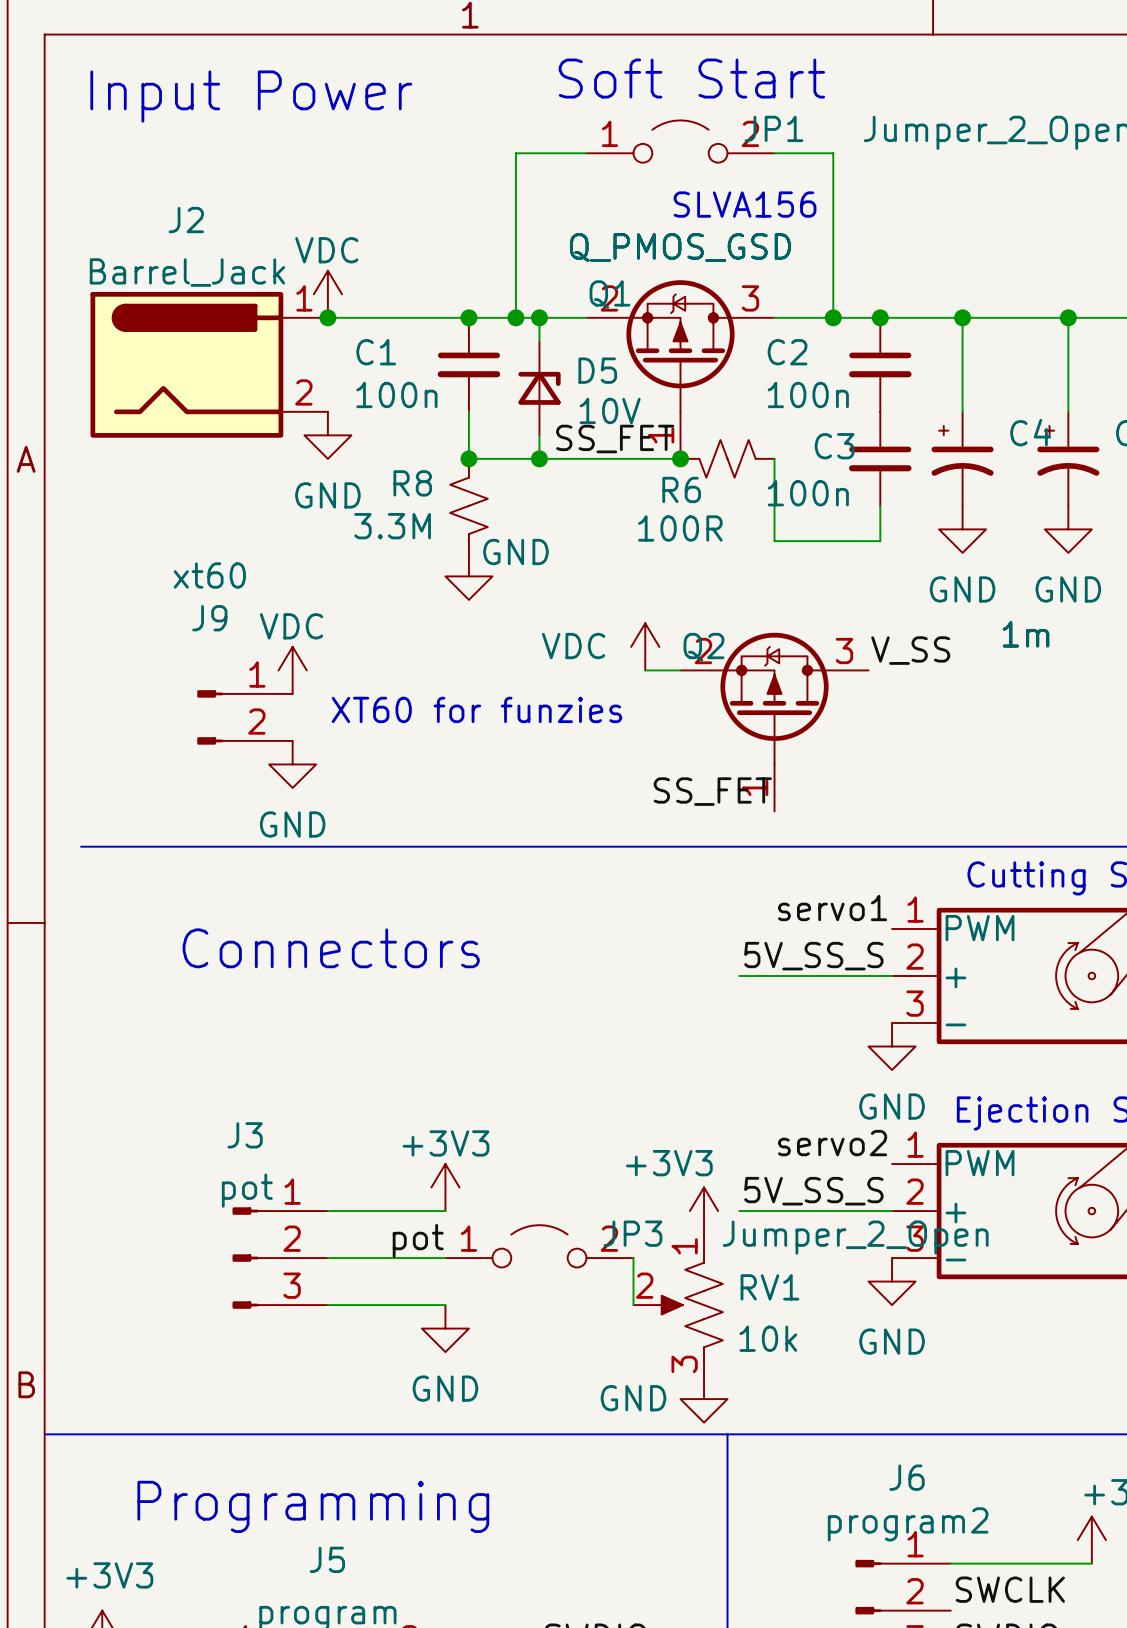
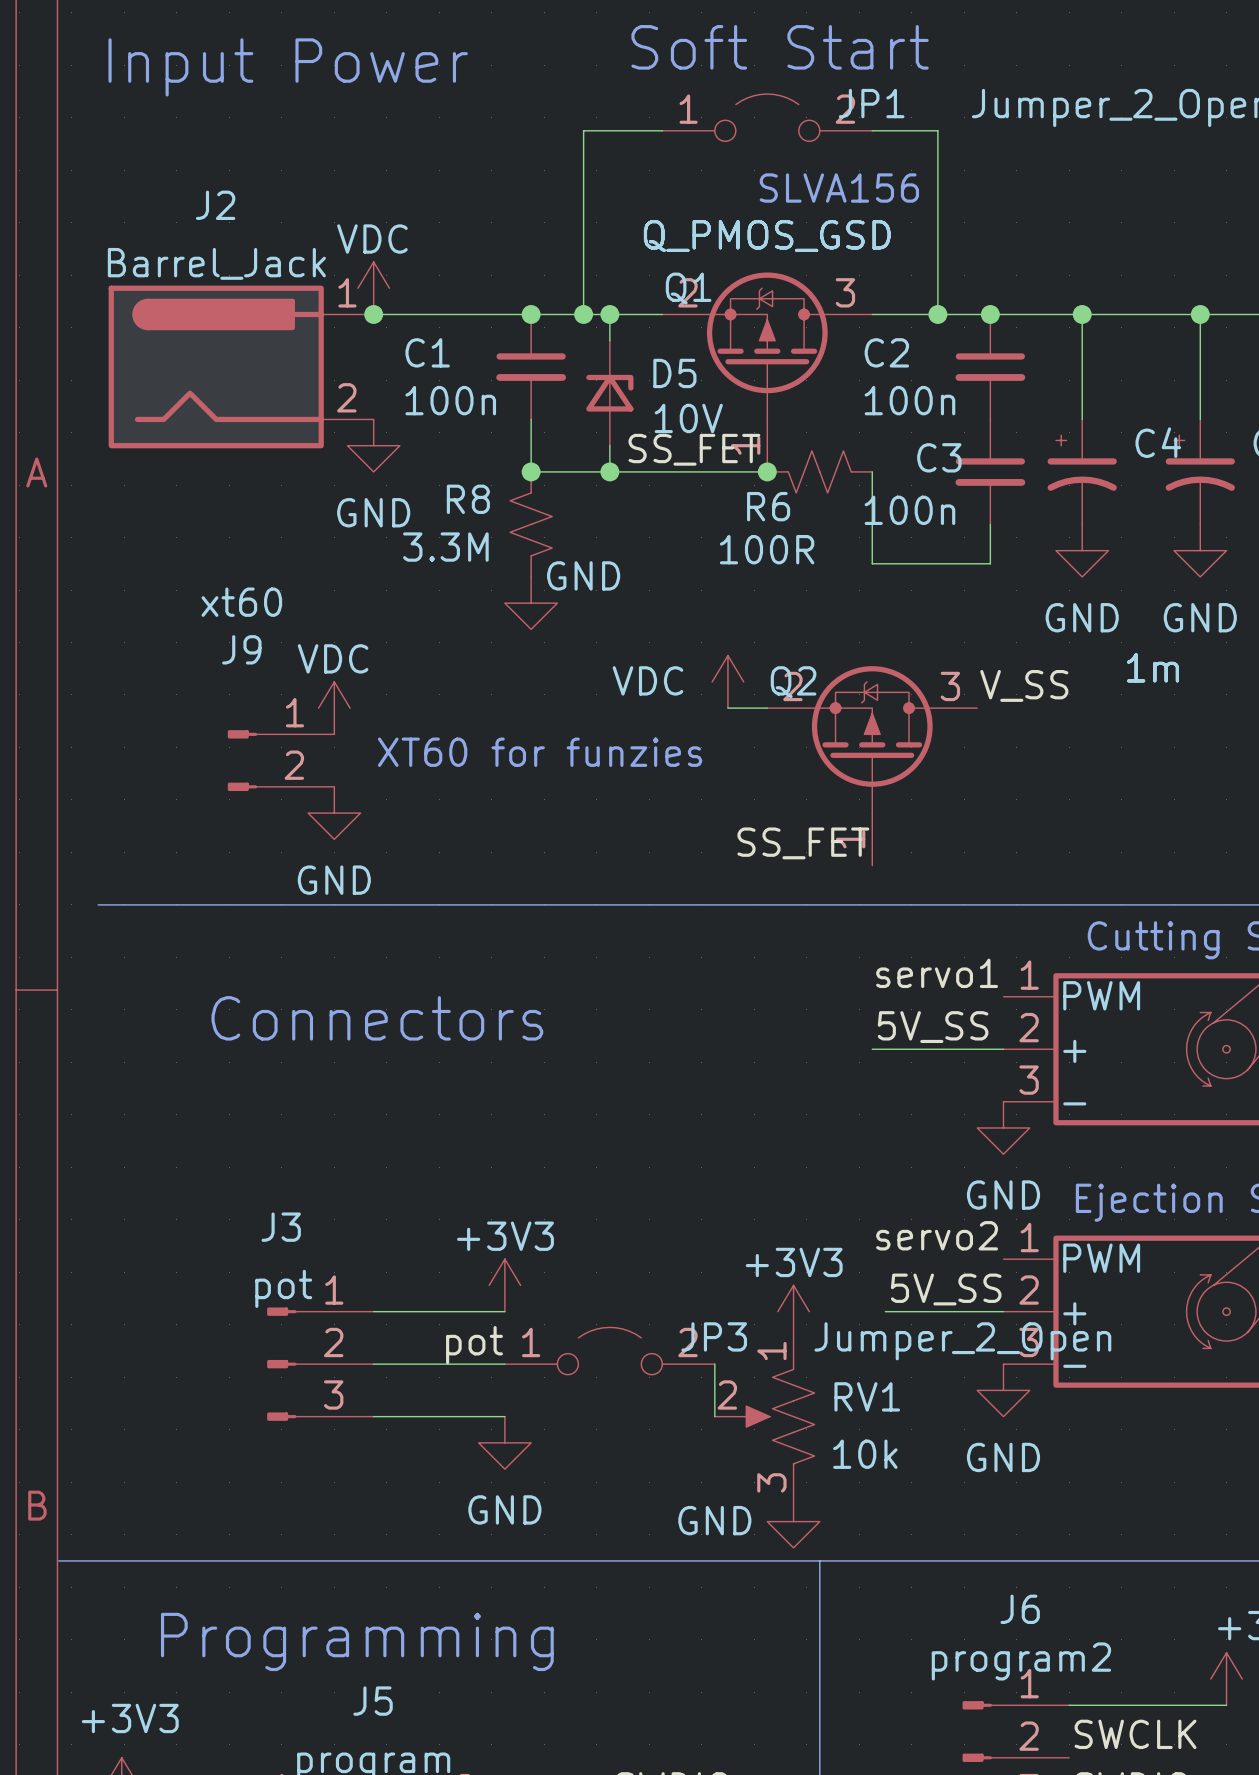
label: 5V_SS_S (813, 956) -> 5V_SS (933, 1027)
wire: (739, 975) (774, 975) -> none
power symbol text position: +3V3 (669, 1163) -> +3V3 (794, 1262)
label: 5V_SS_S (813, 1191) -> 5V_SS (946, 1289)
wire: (739, 1211) (786, 1211) -> none

